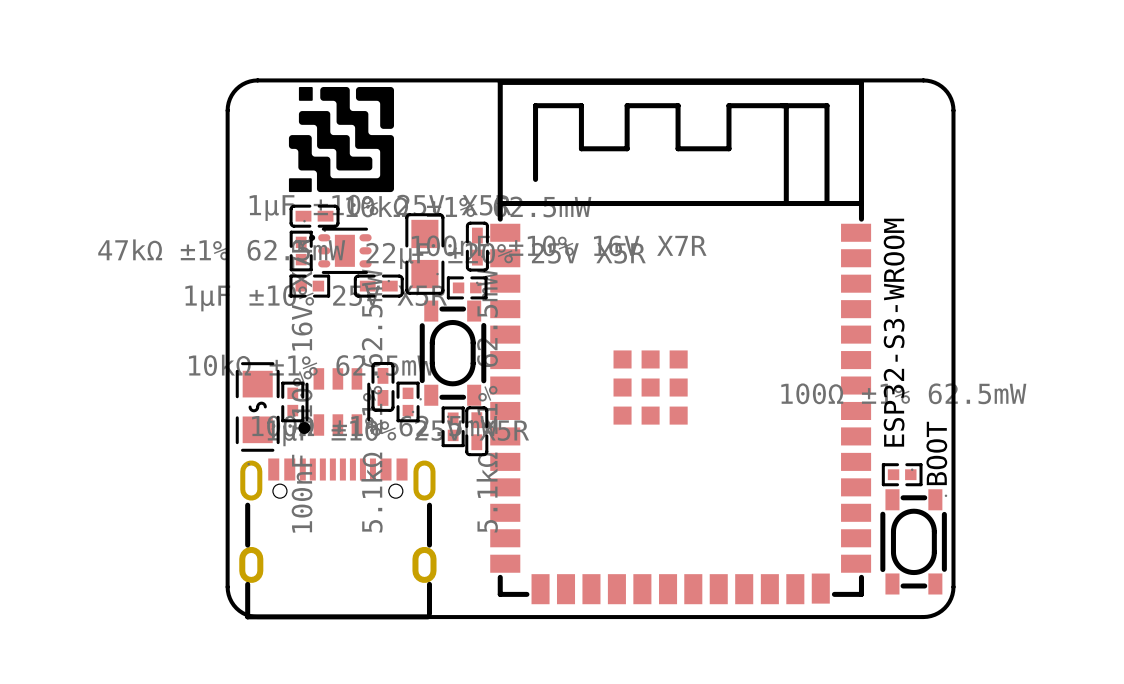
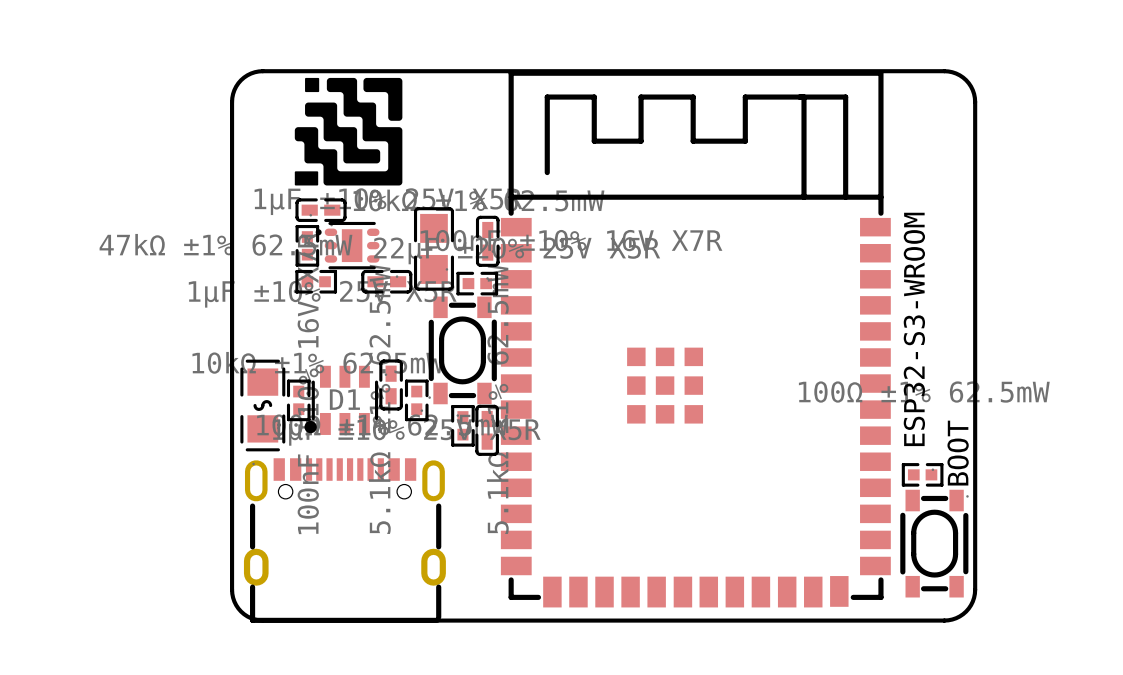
D1 name: none -> D1 (344, 399)

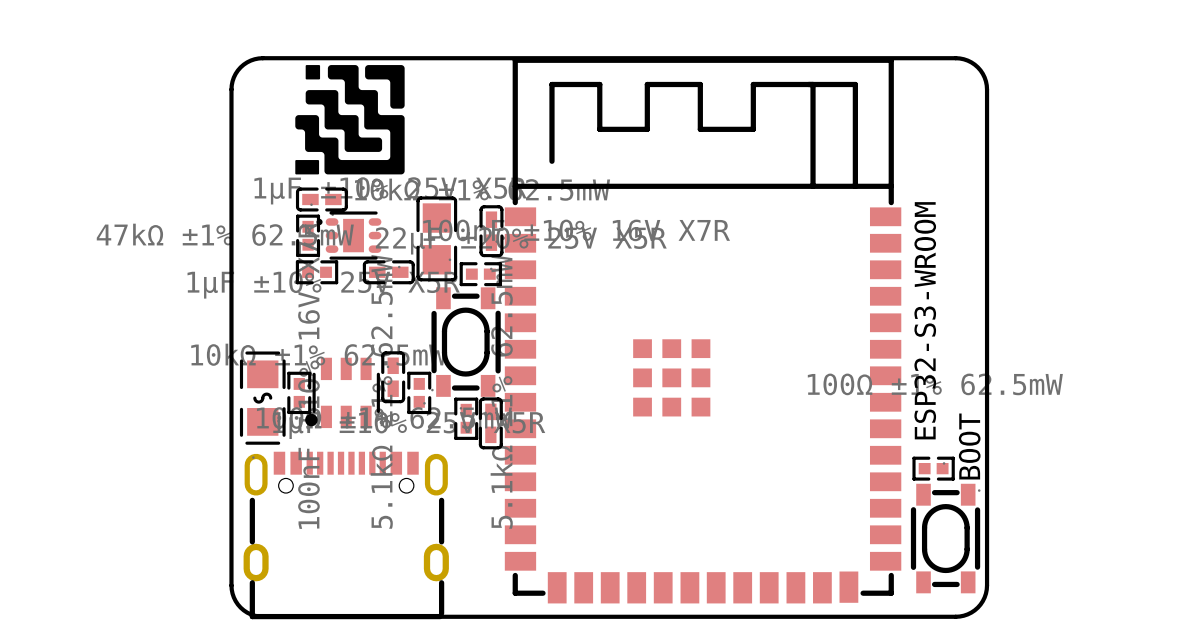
D1 name: D1 (344, 399) -> none

